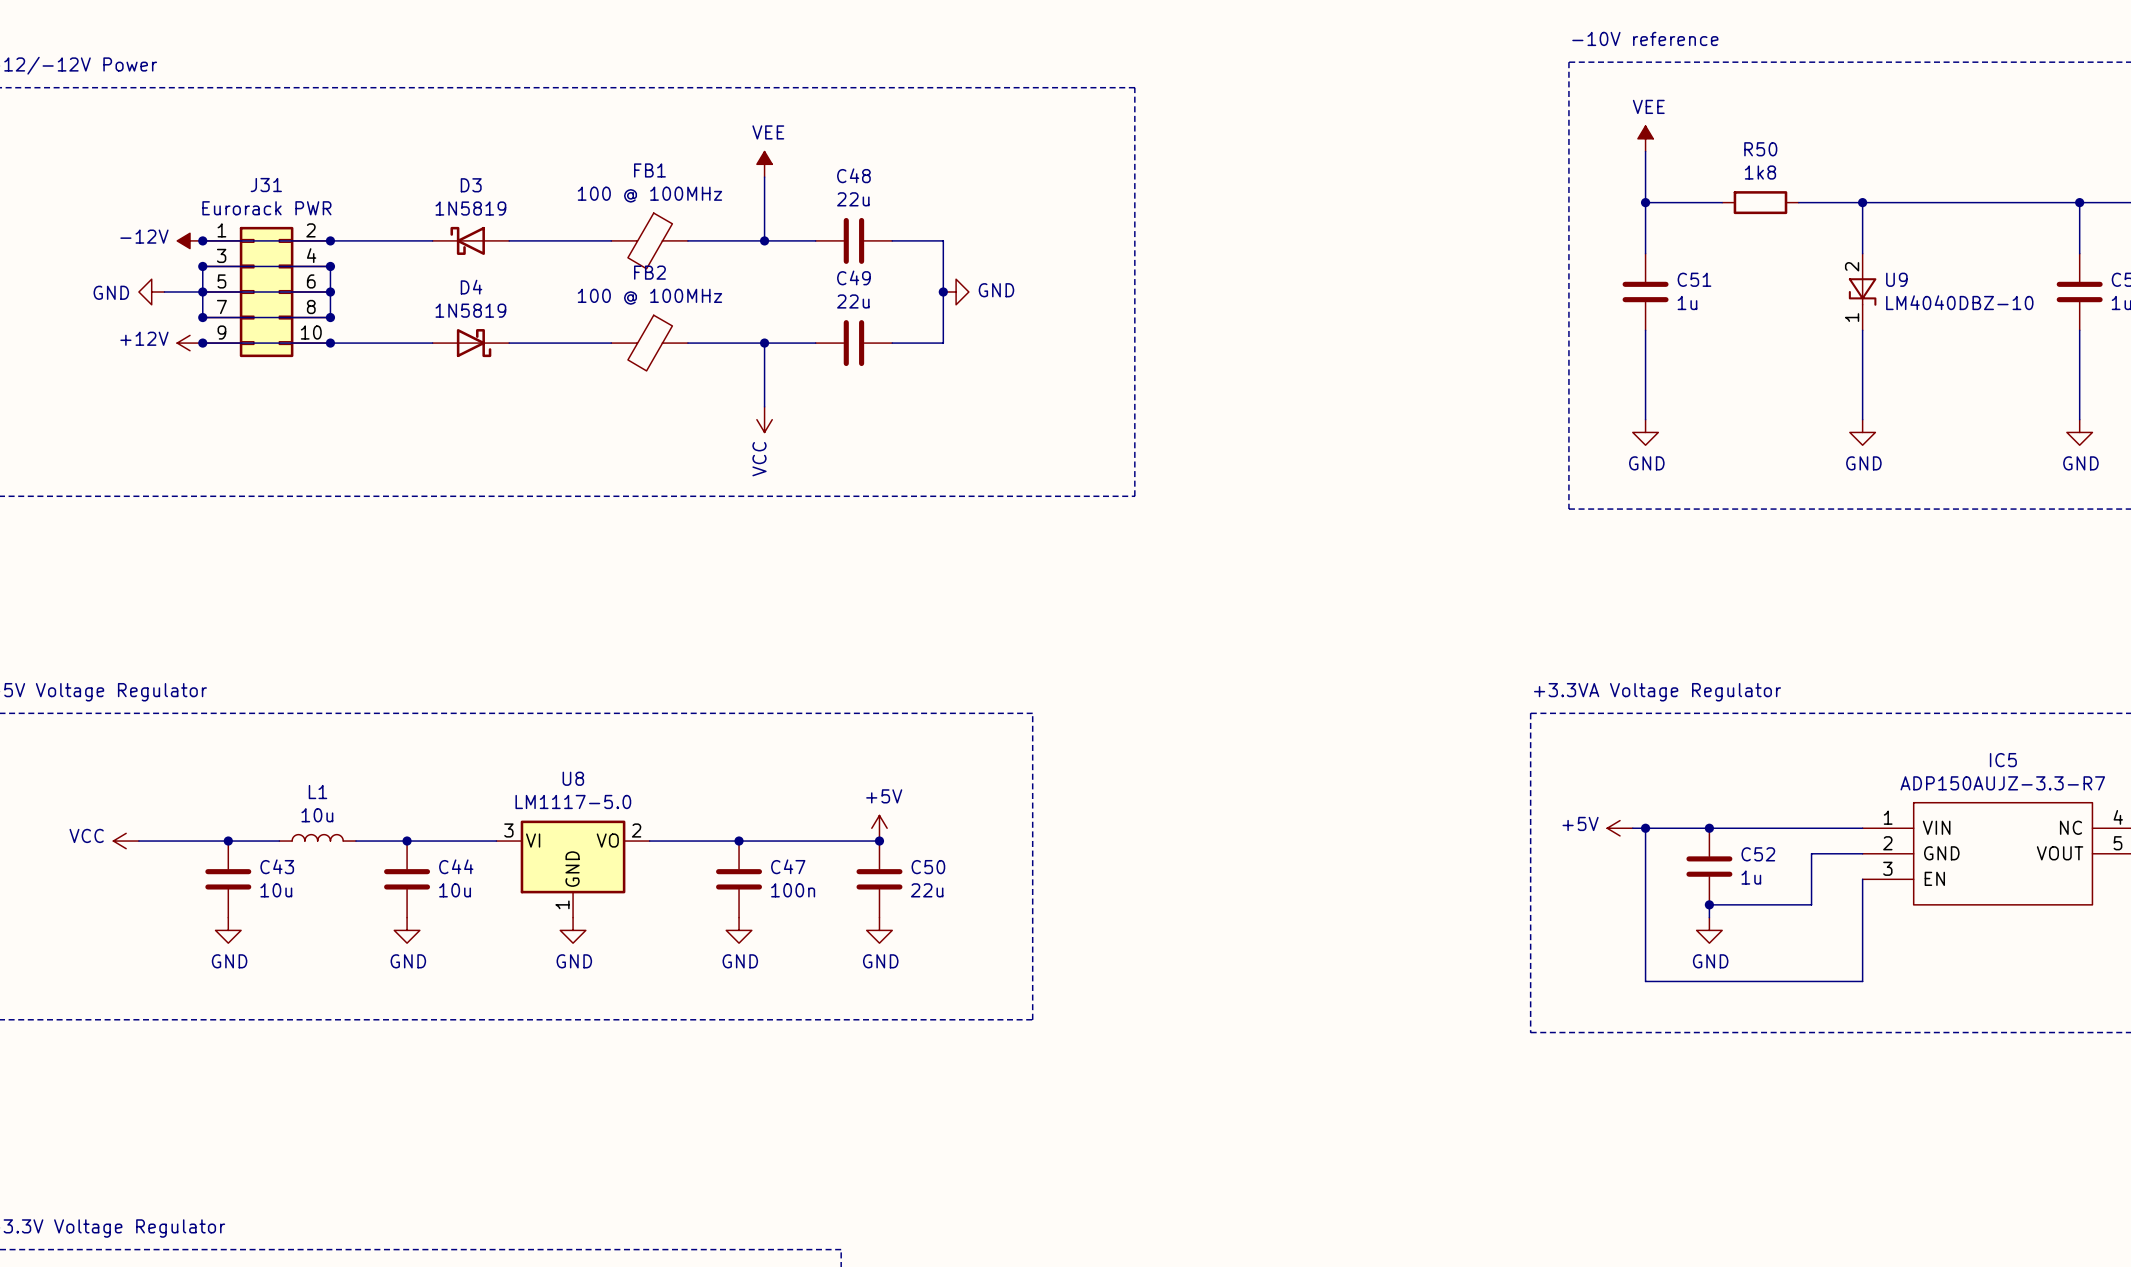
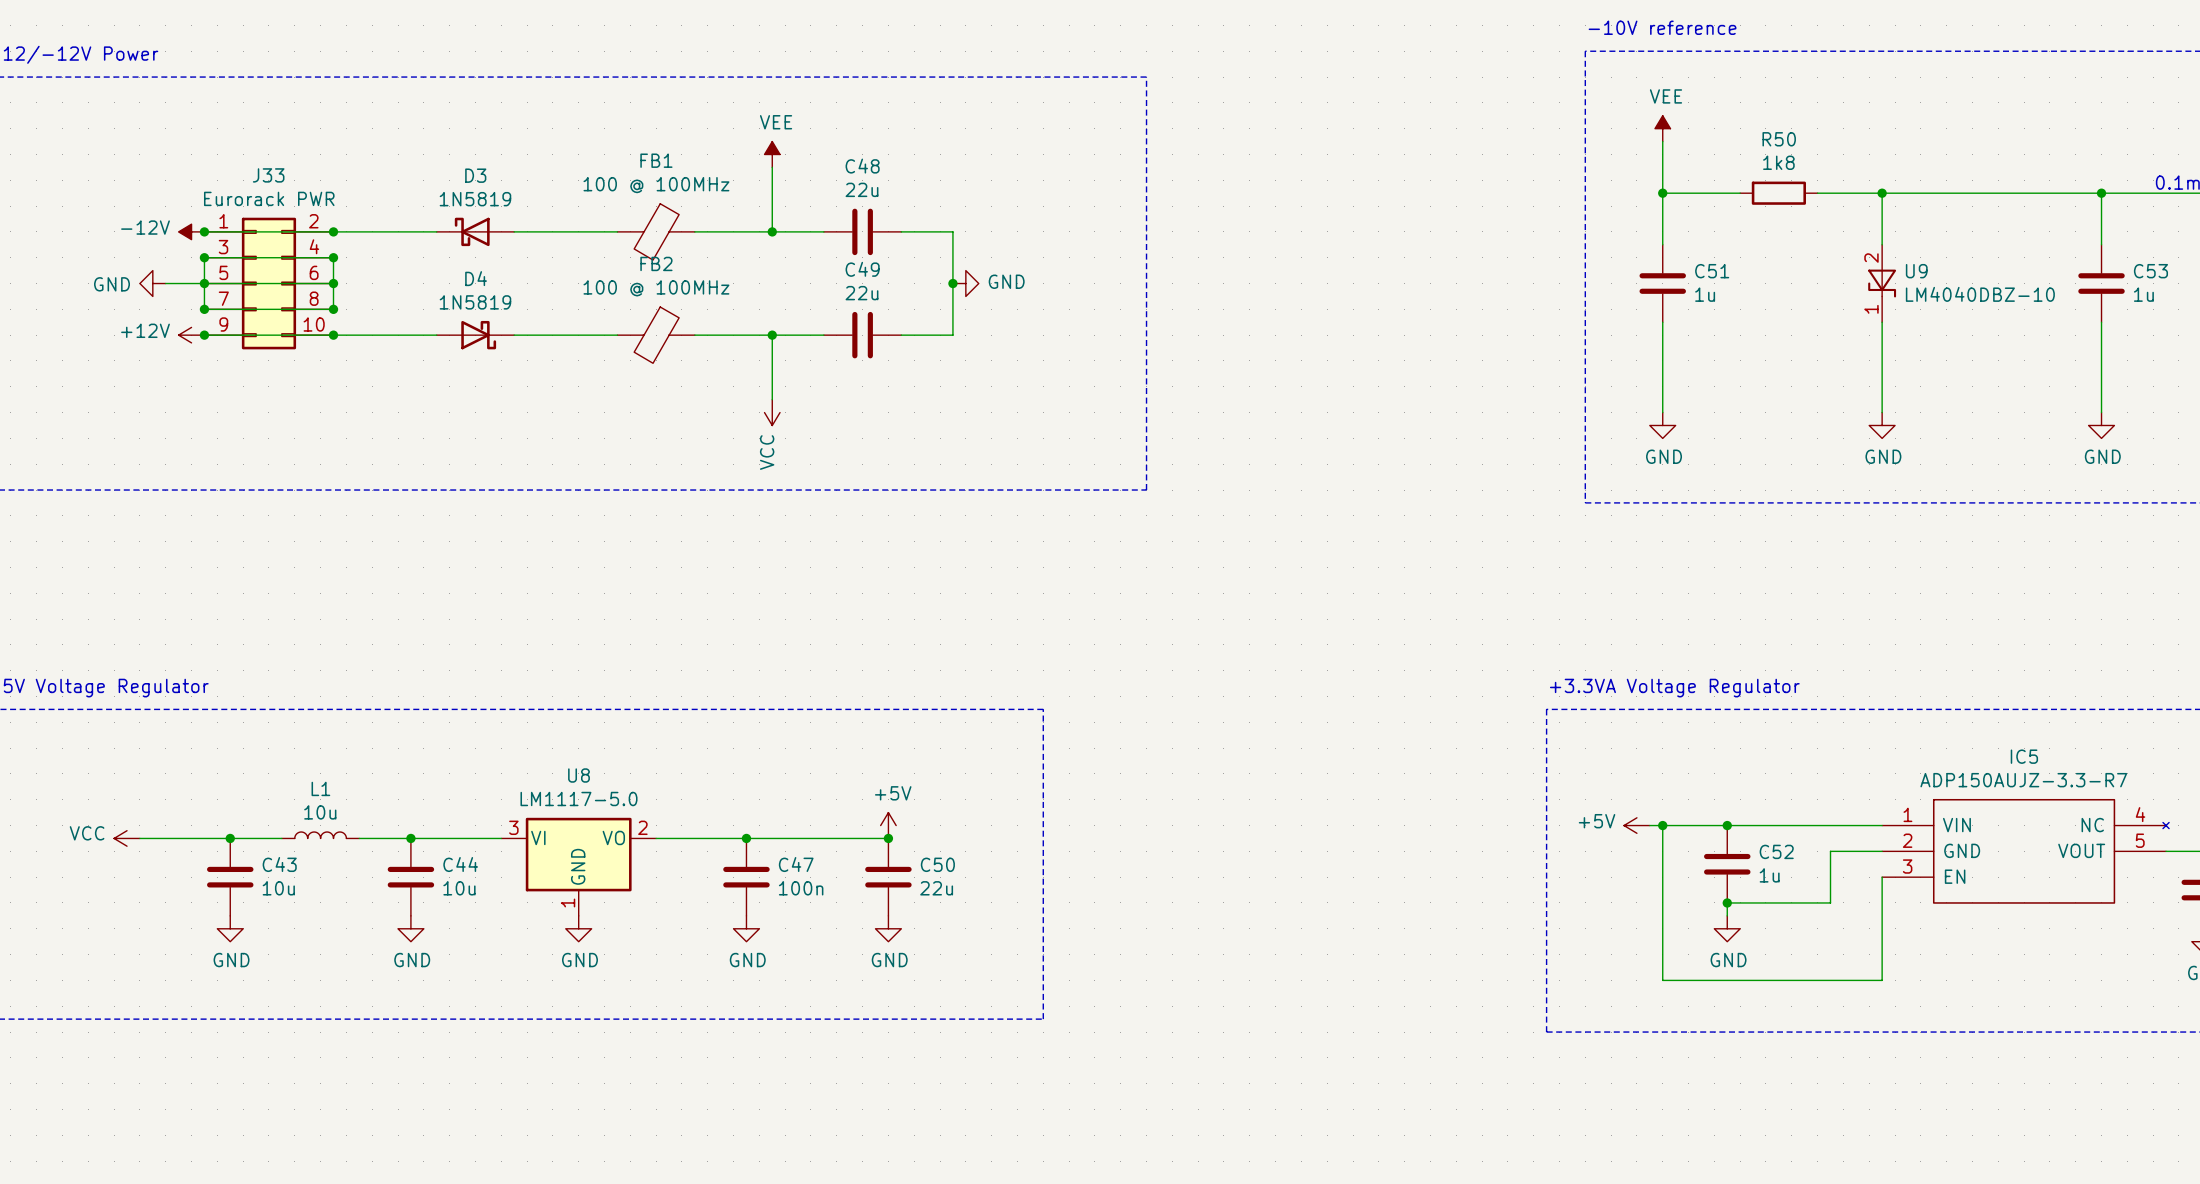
J31 name: J31 (266, 185) -> J33 (268, 175)

